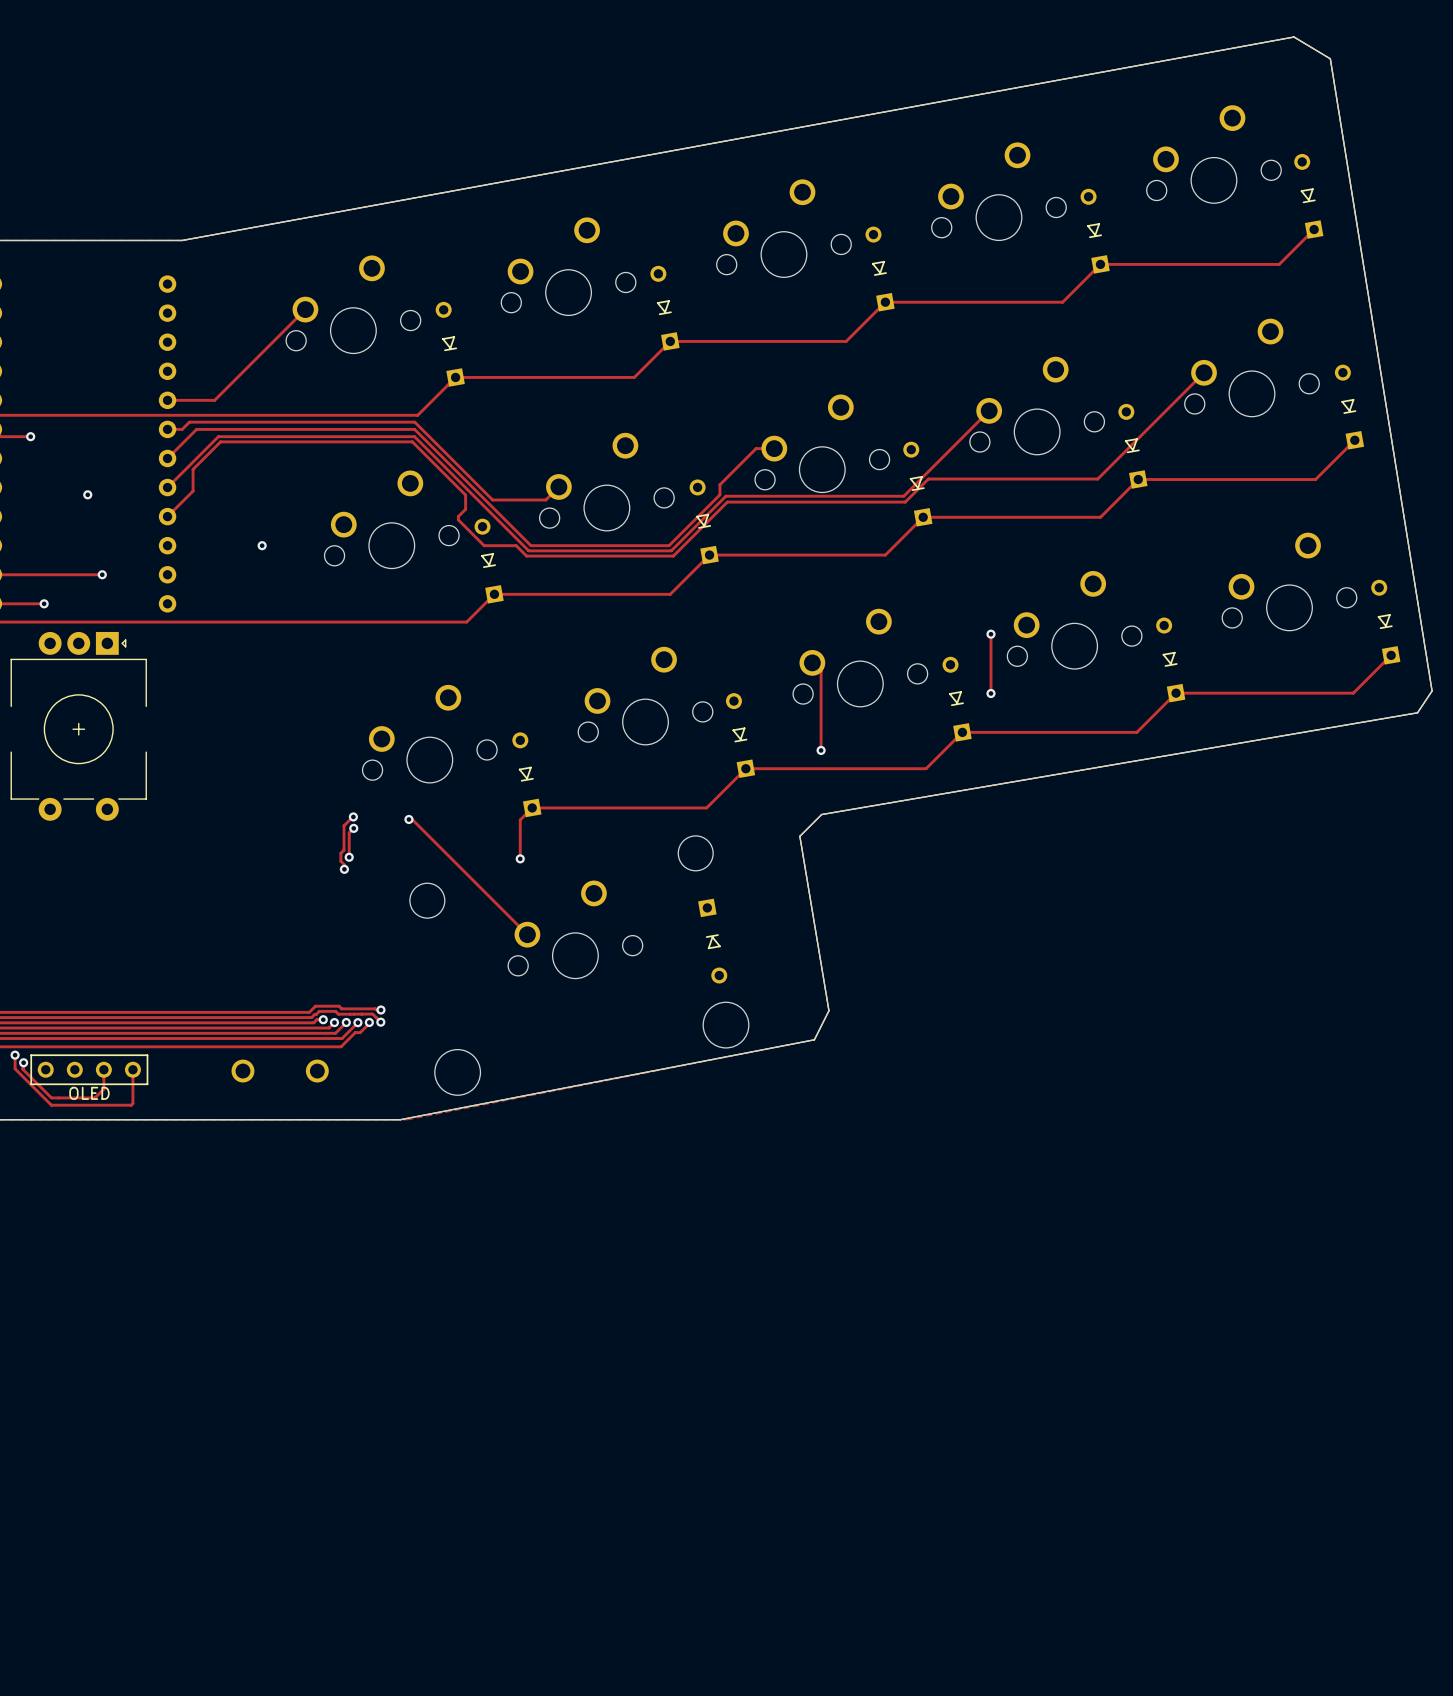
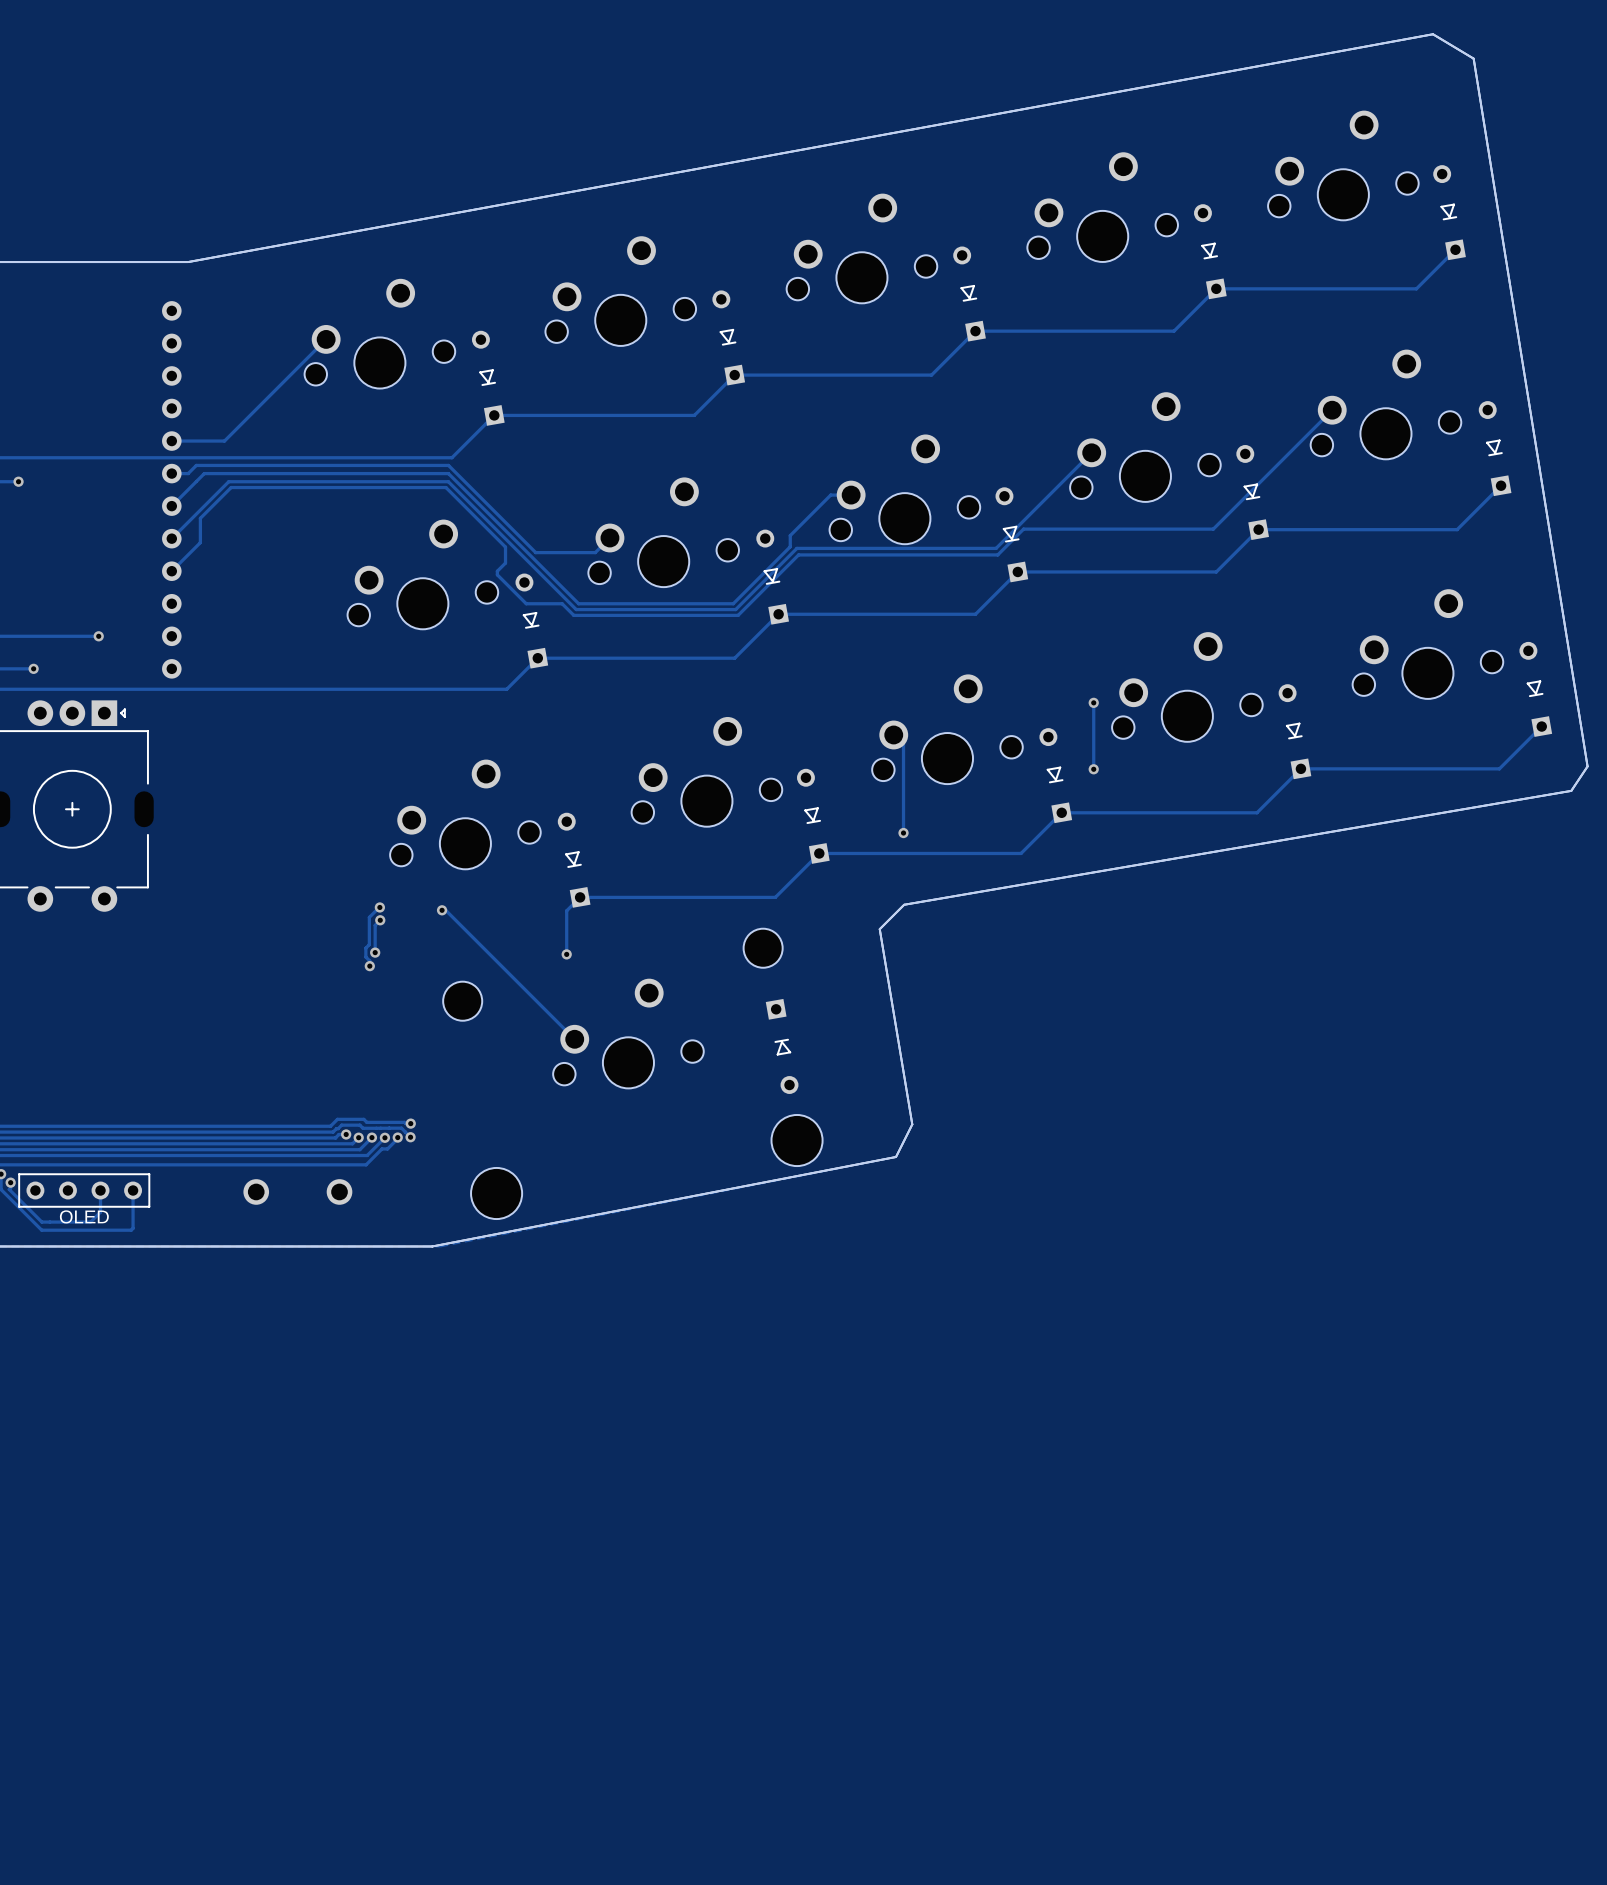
via: (87, 494) -> none
via: (262, 545) -> none

